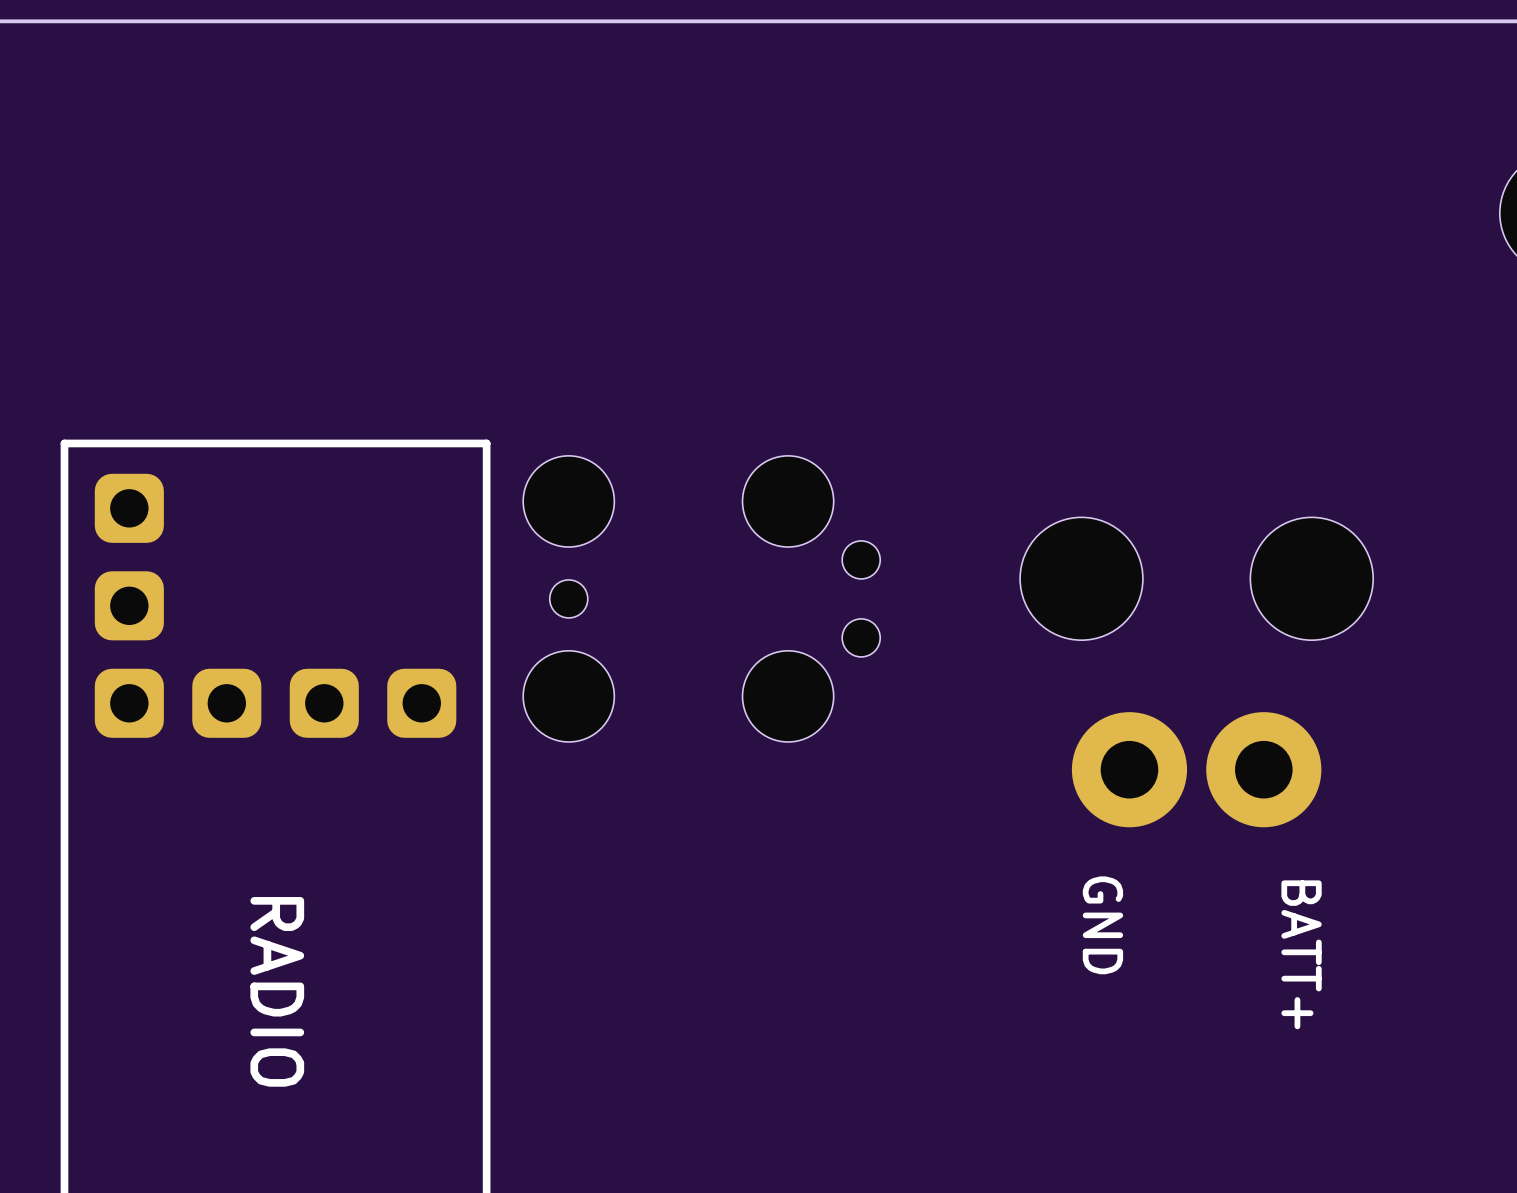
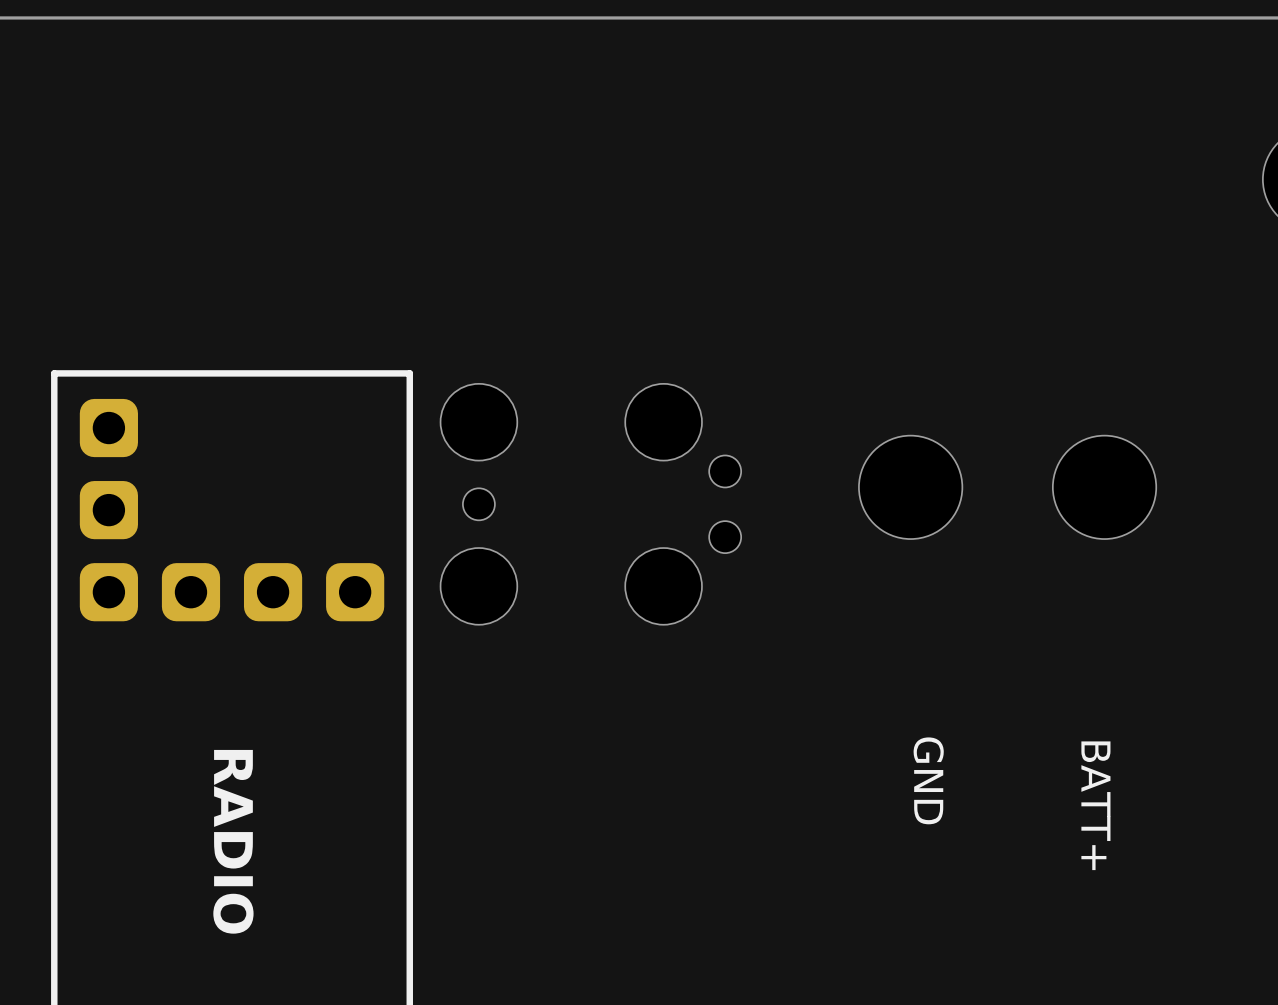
part: (1129, 769) -> none
part: (1263, 769) -> none

